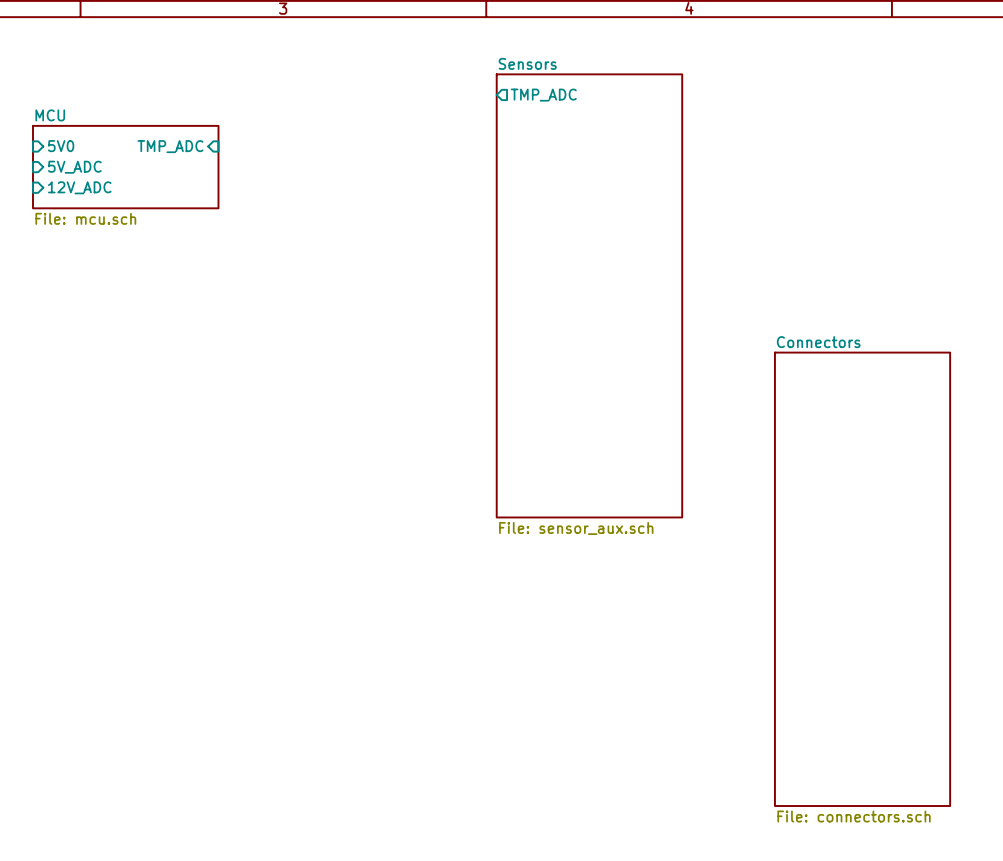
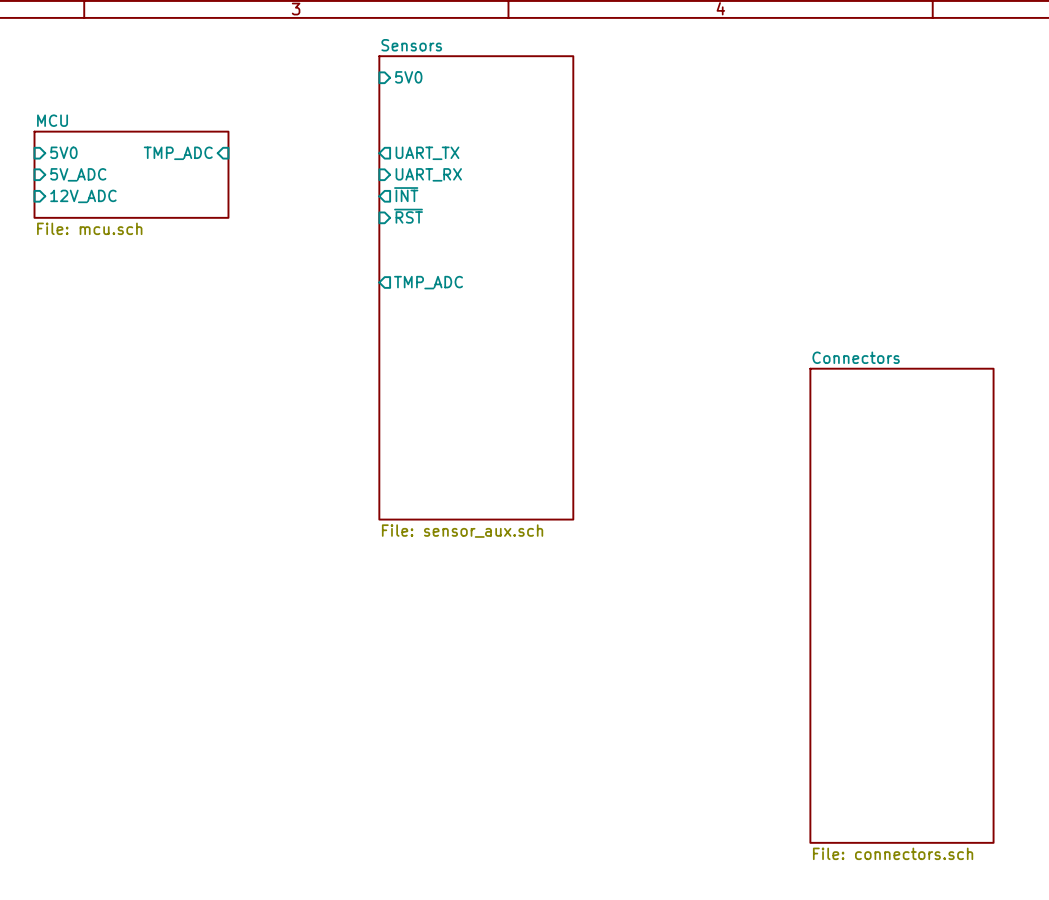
sheet pin: none -> 5V0 (408, 77)
sheet pin: TMP_ADC (543, 95) -> none
sheet pin: none -> UART_TX (427, 153)
sheet pin: none -> UART_RX (428, 174)
sheet pin: none -> ~{INT} (406, 194)
sheet pin: none -> ~{RST} (408, 216)
sheet pin: none -> TMP_ADC (428, 282)
sheet Sensors position: (589, 295) -> (476, 287)

